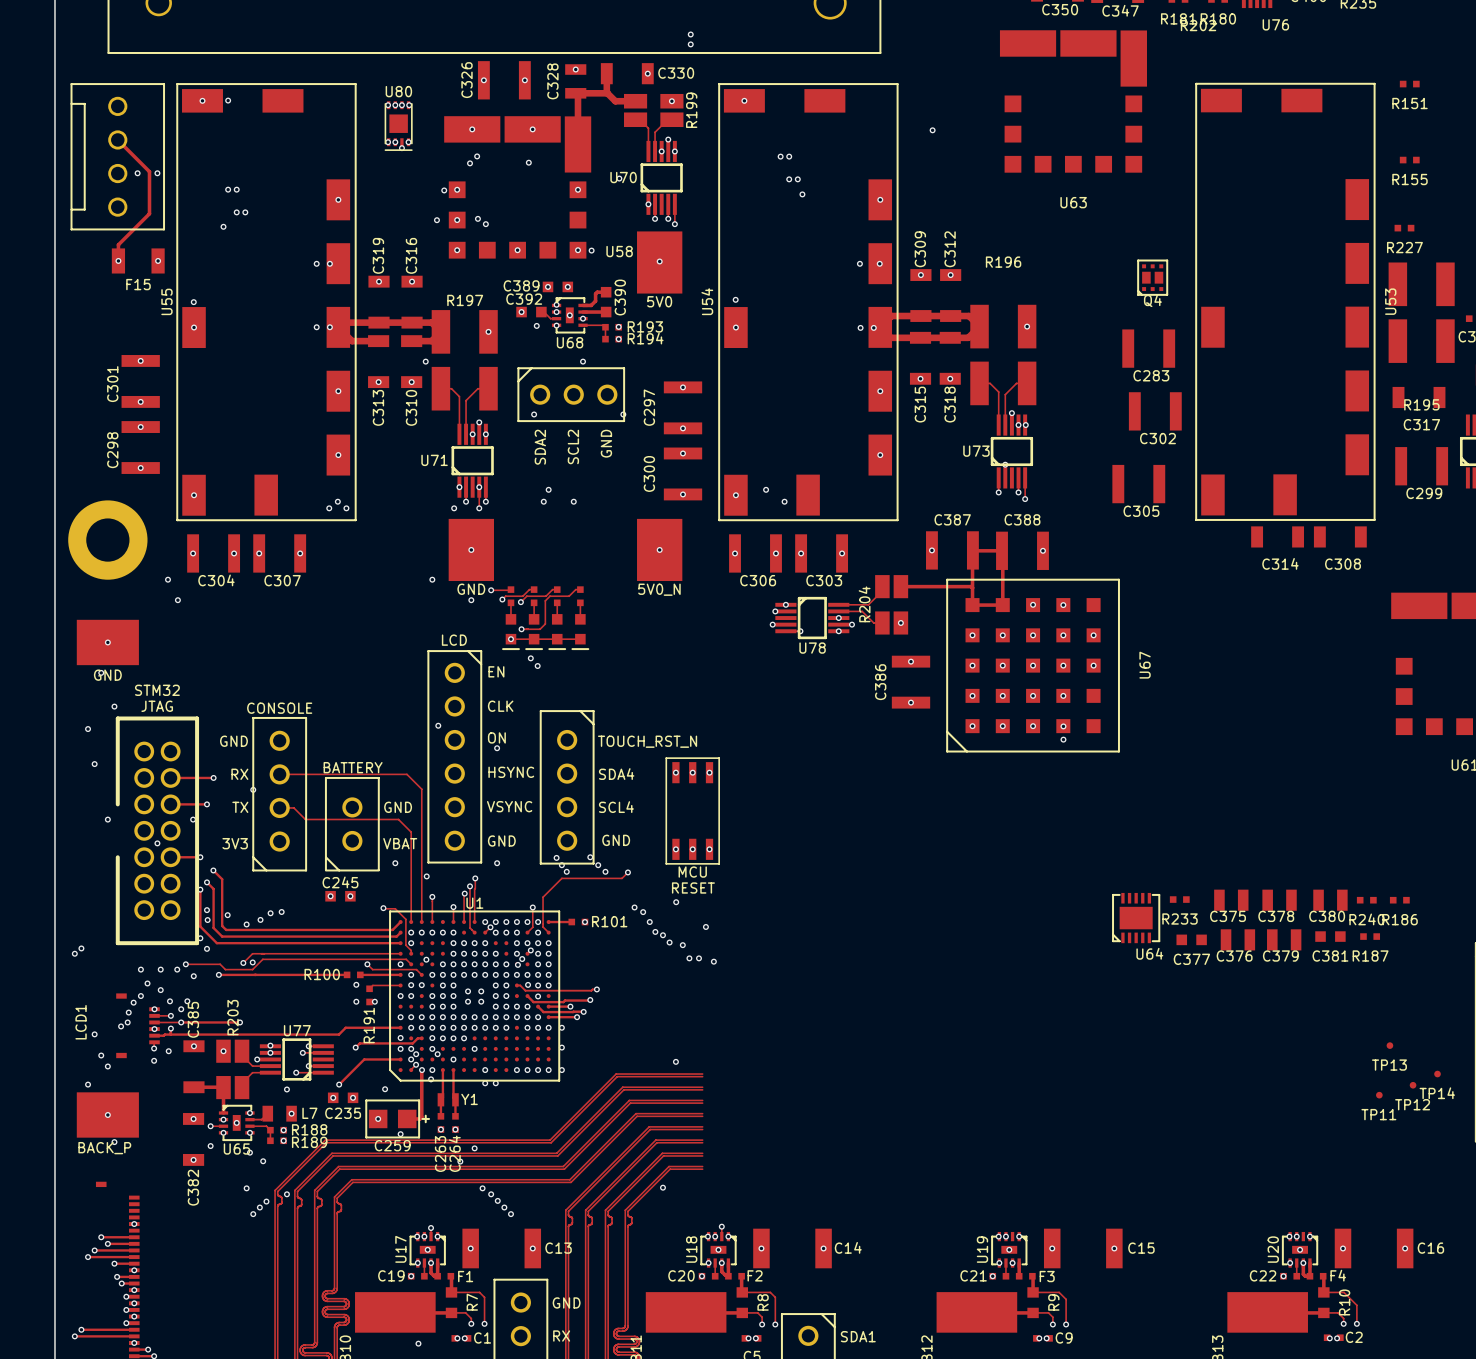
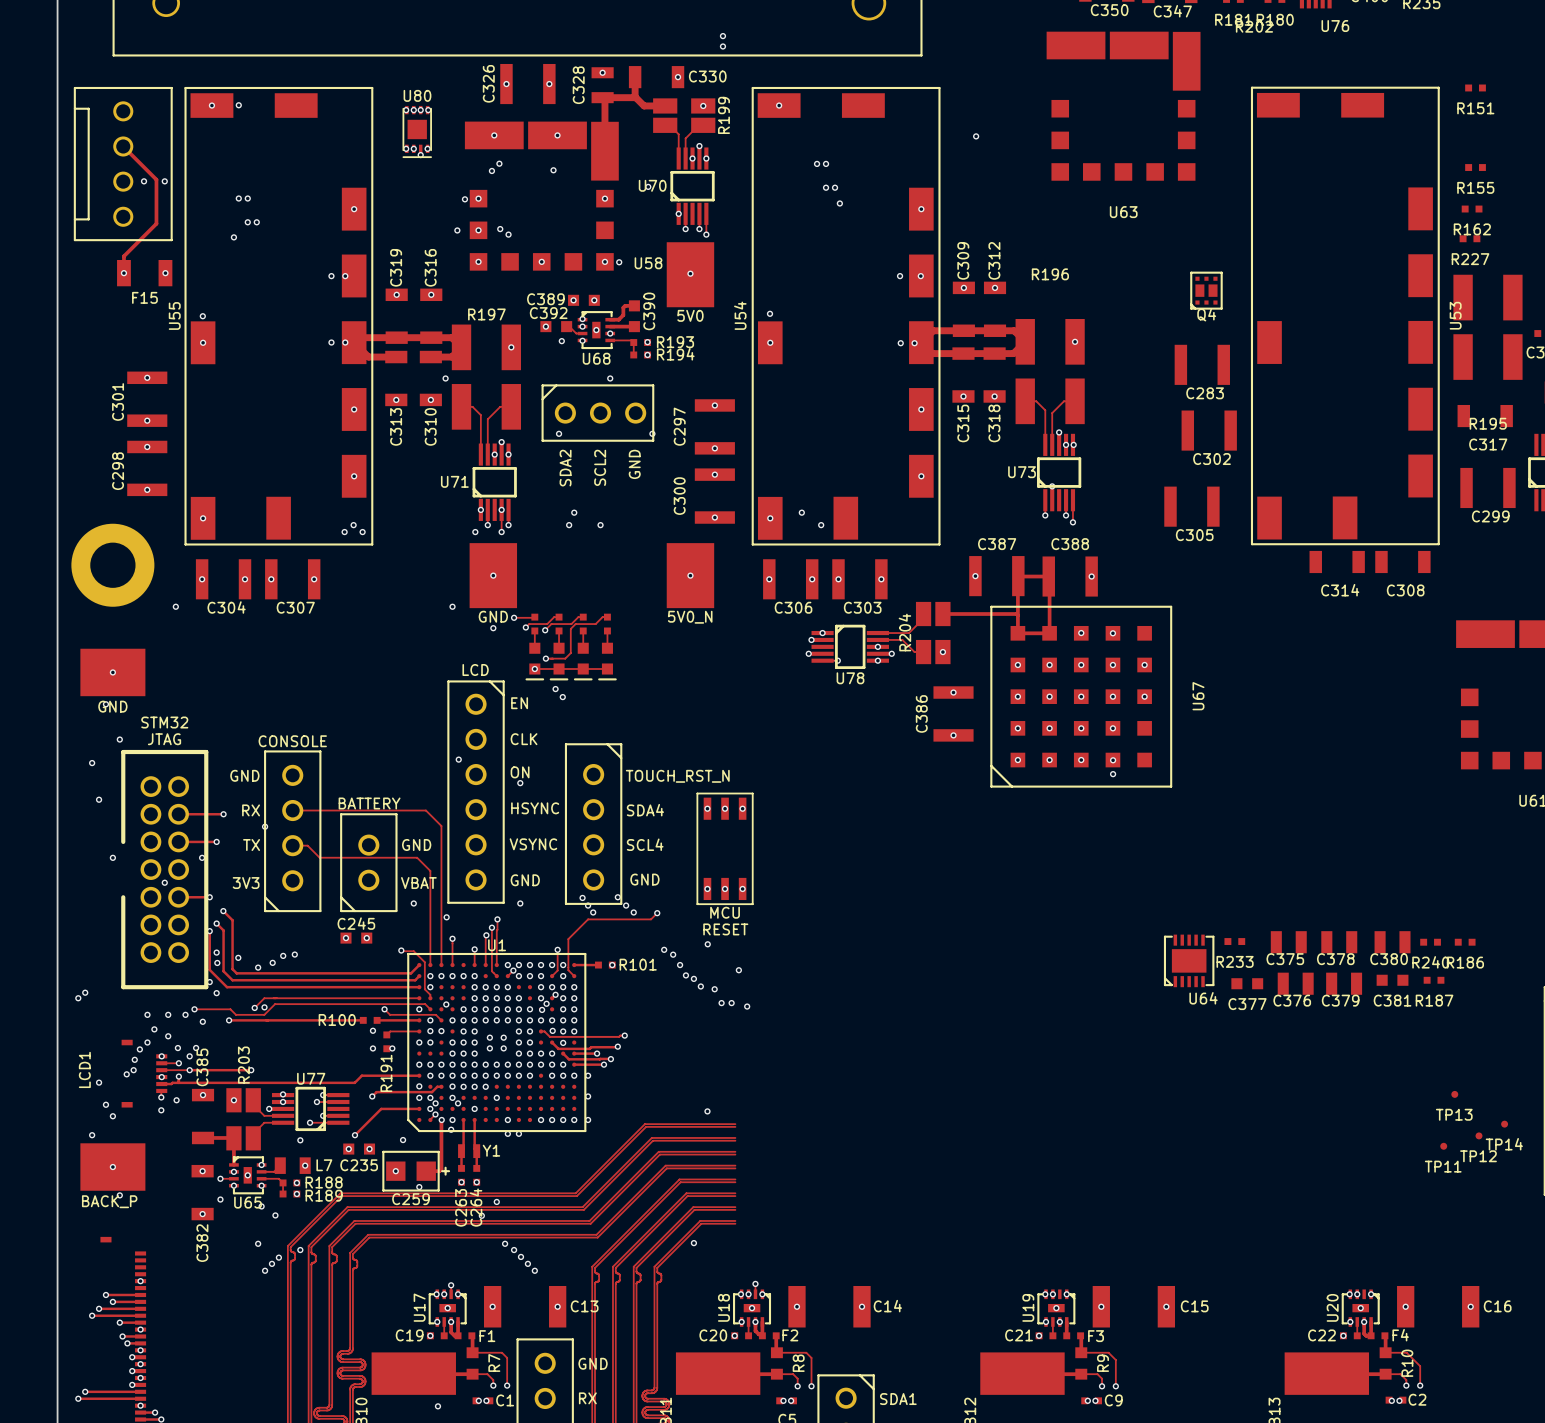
R162: none -> (1472, 209)
via: (177, 600) -> none

